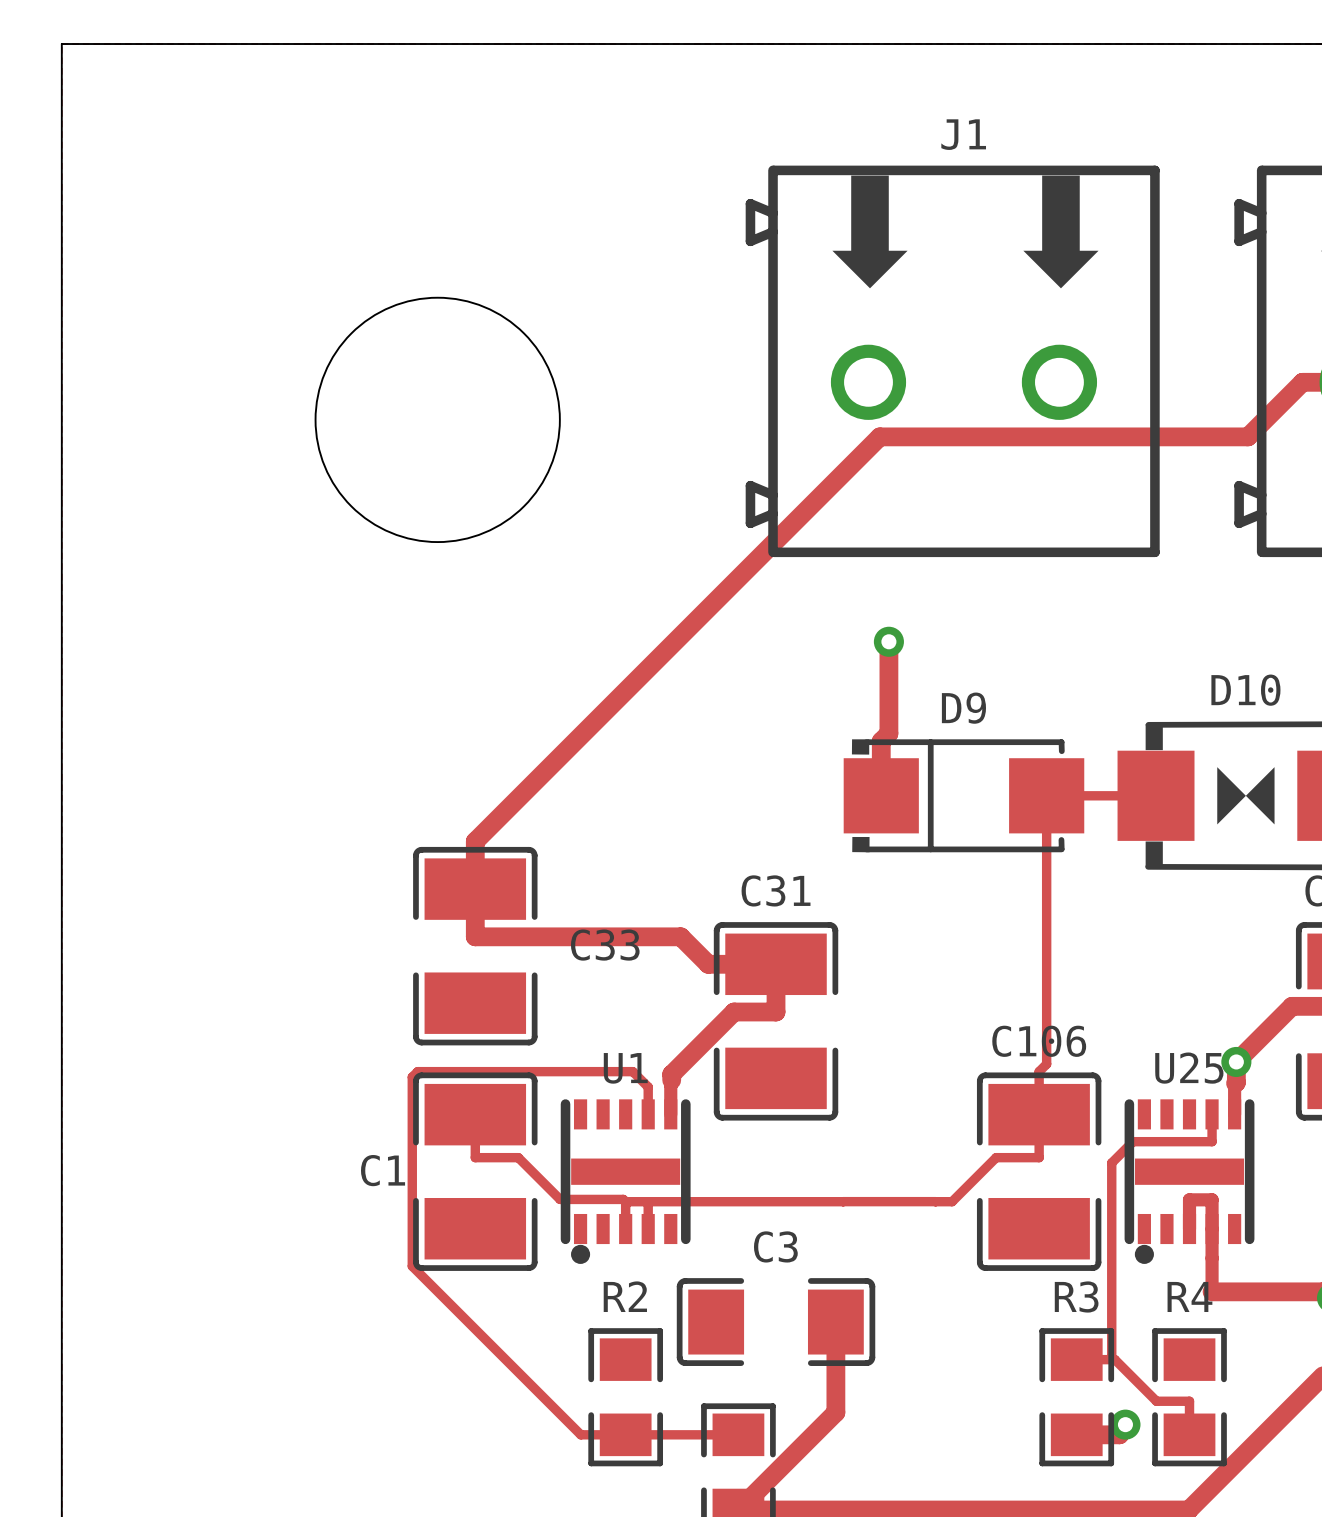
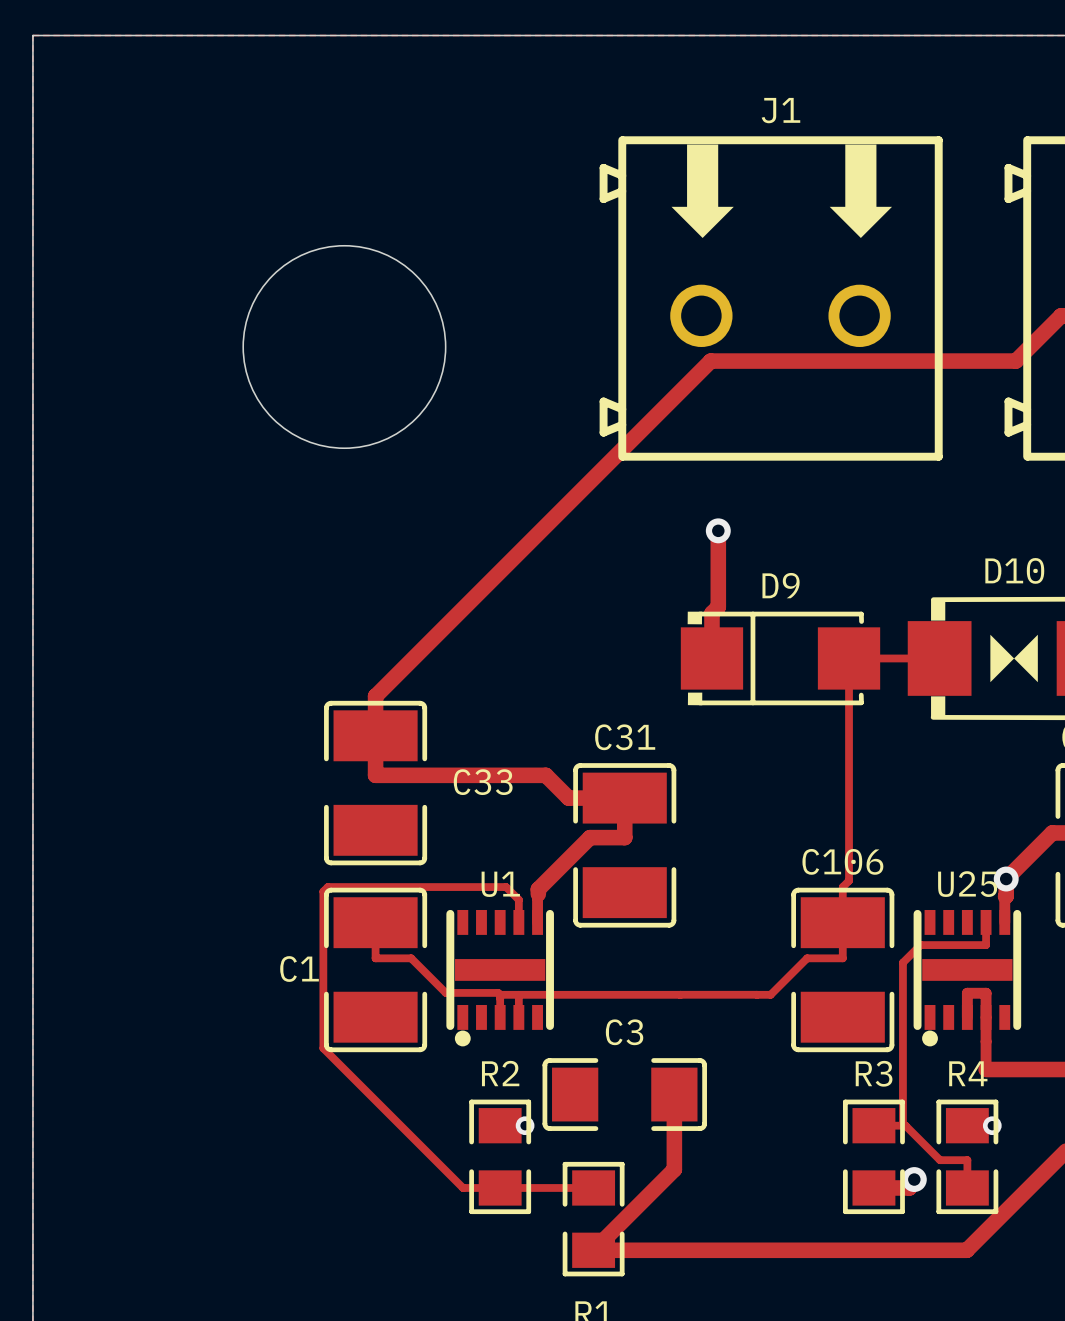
via: none -> (525, 1125)
via: none -> (992, 1125)

